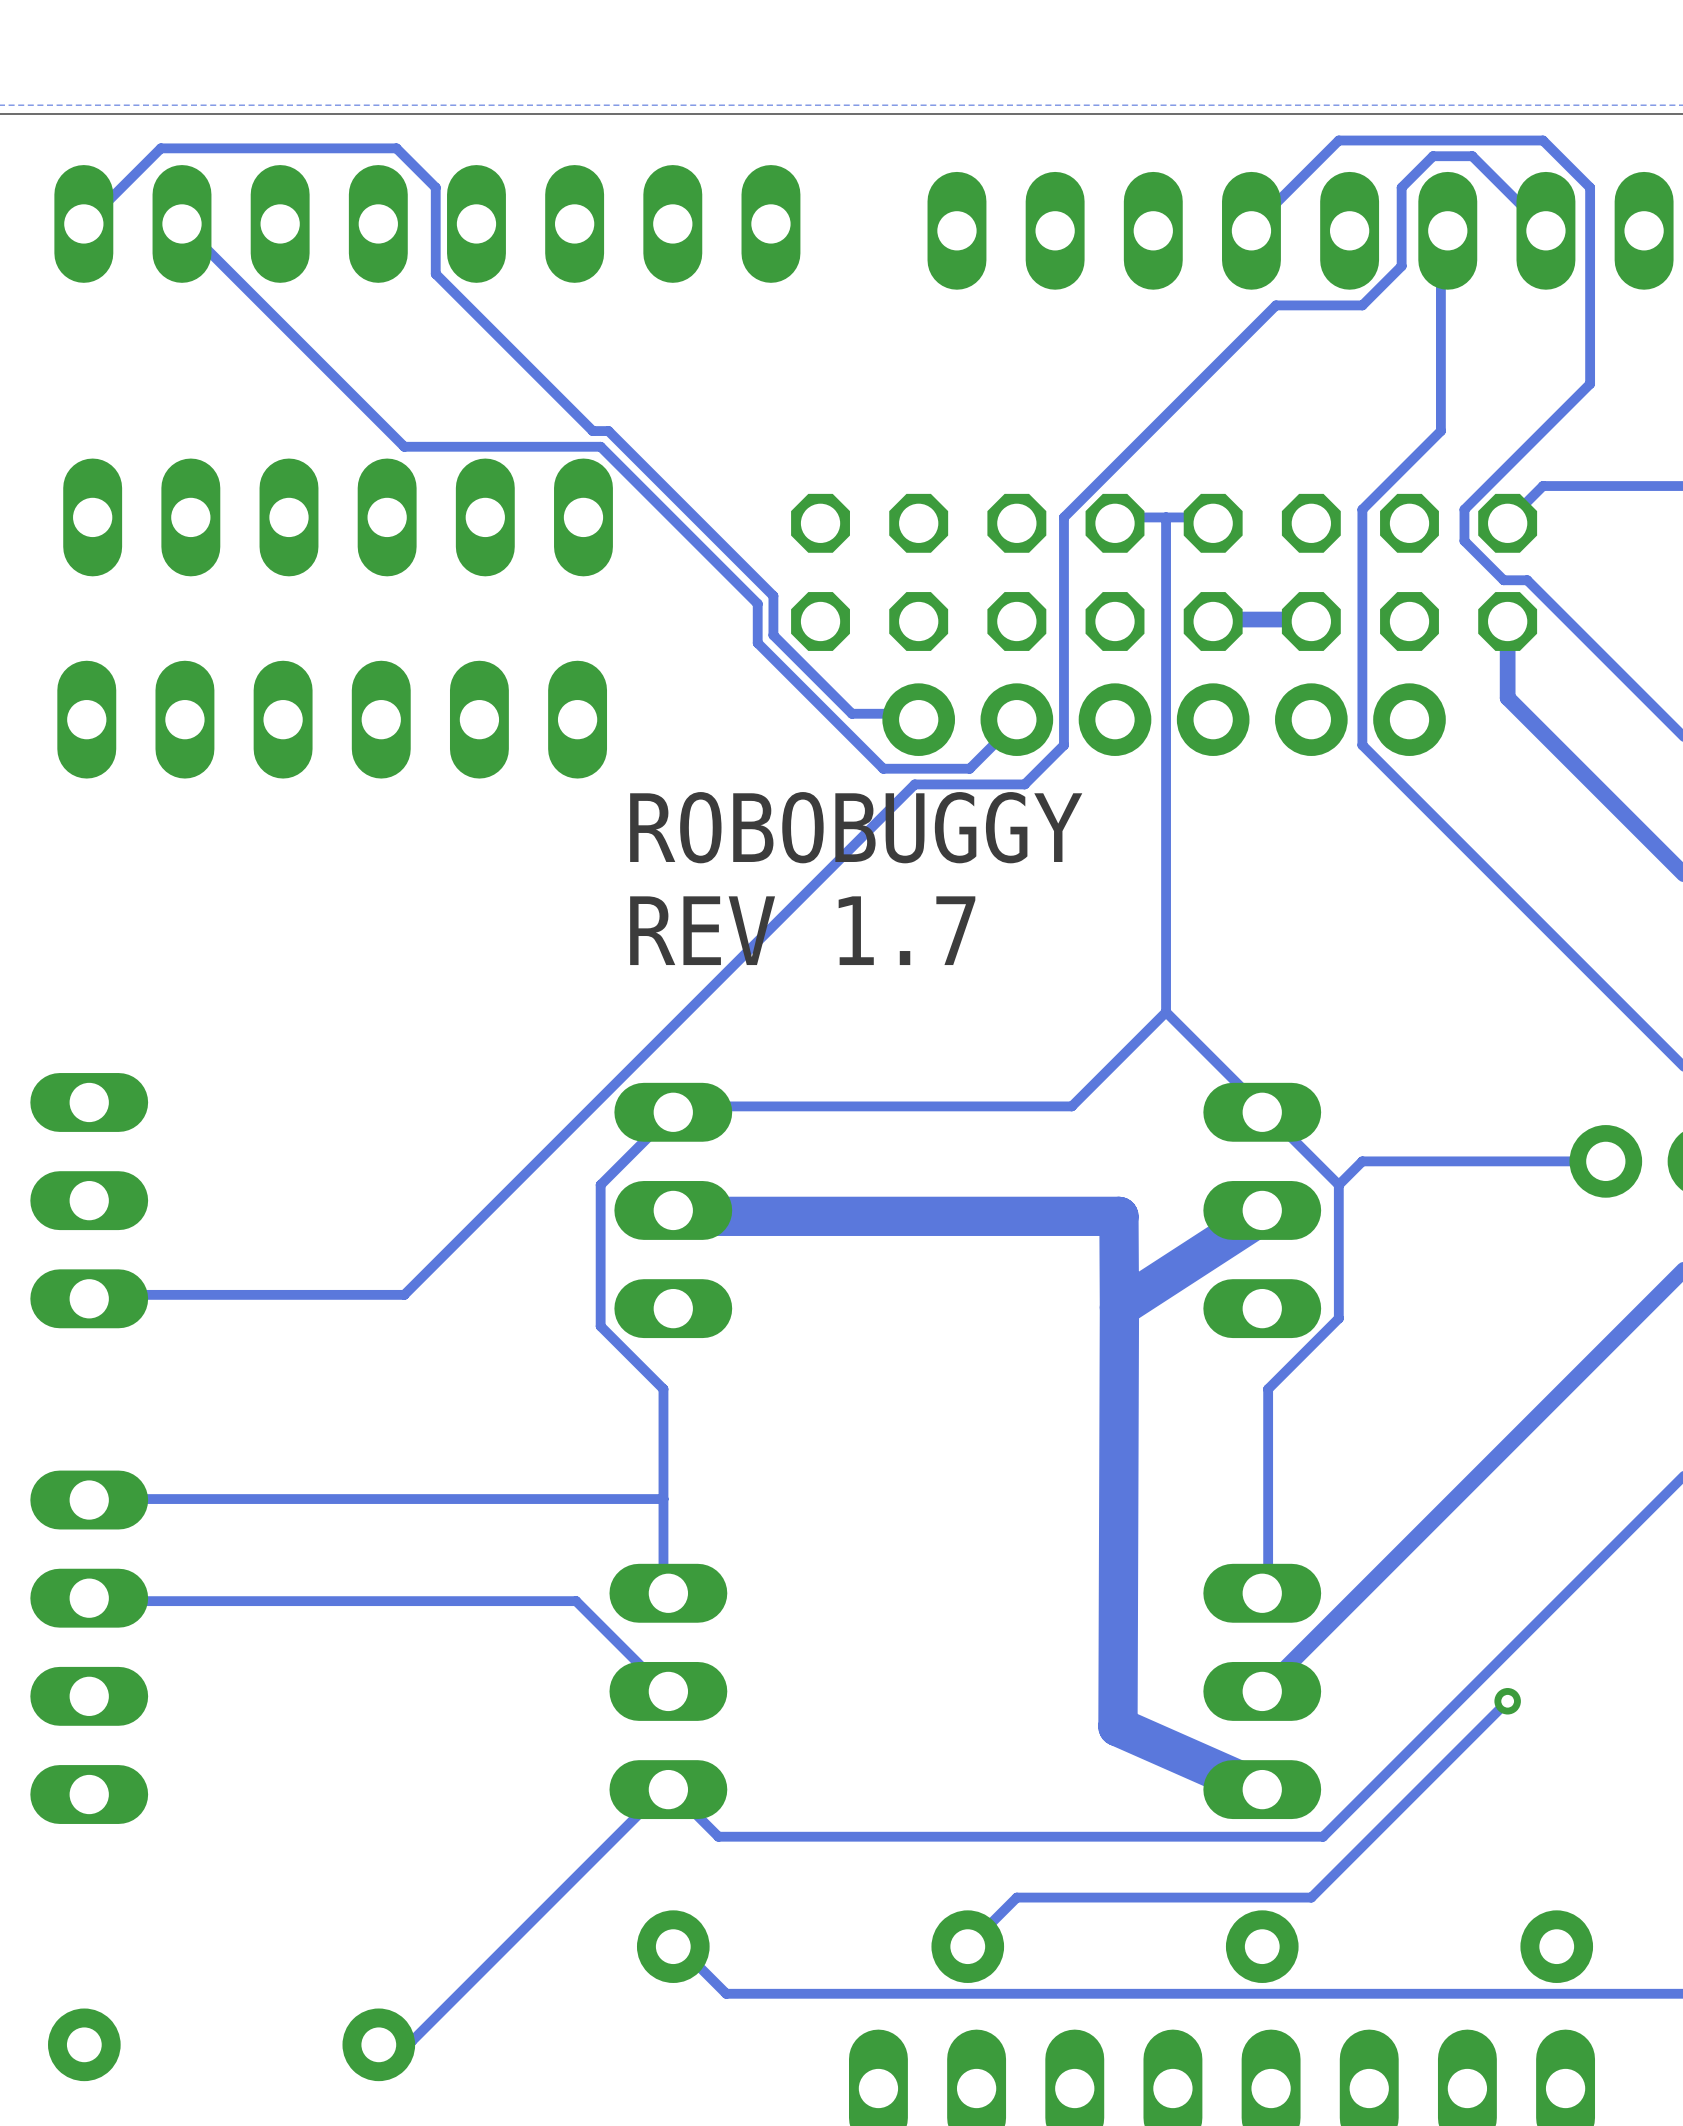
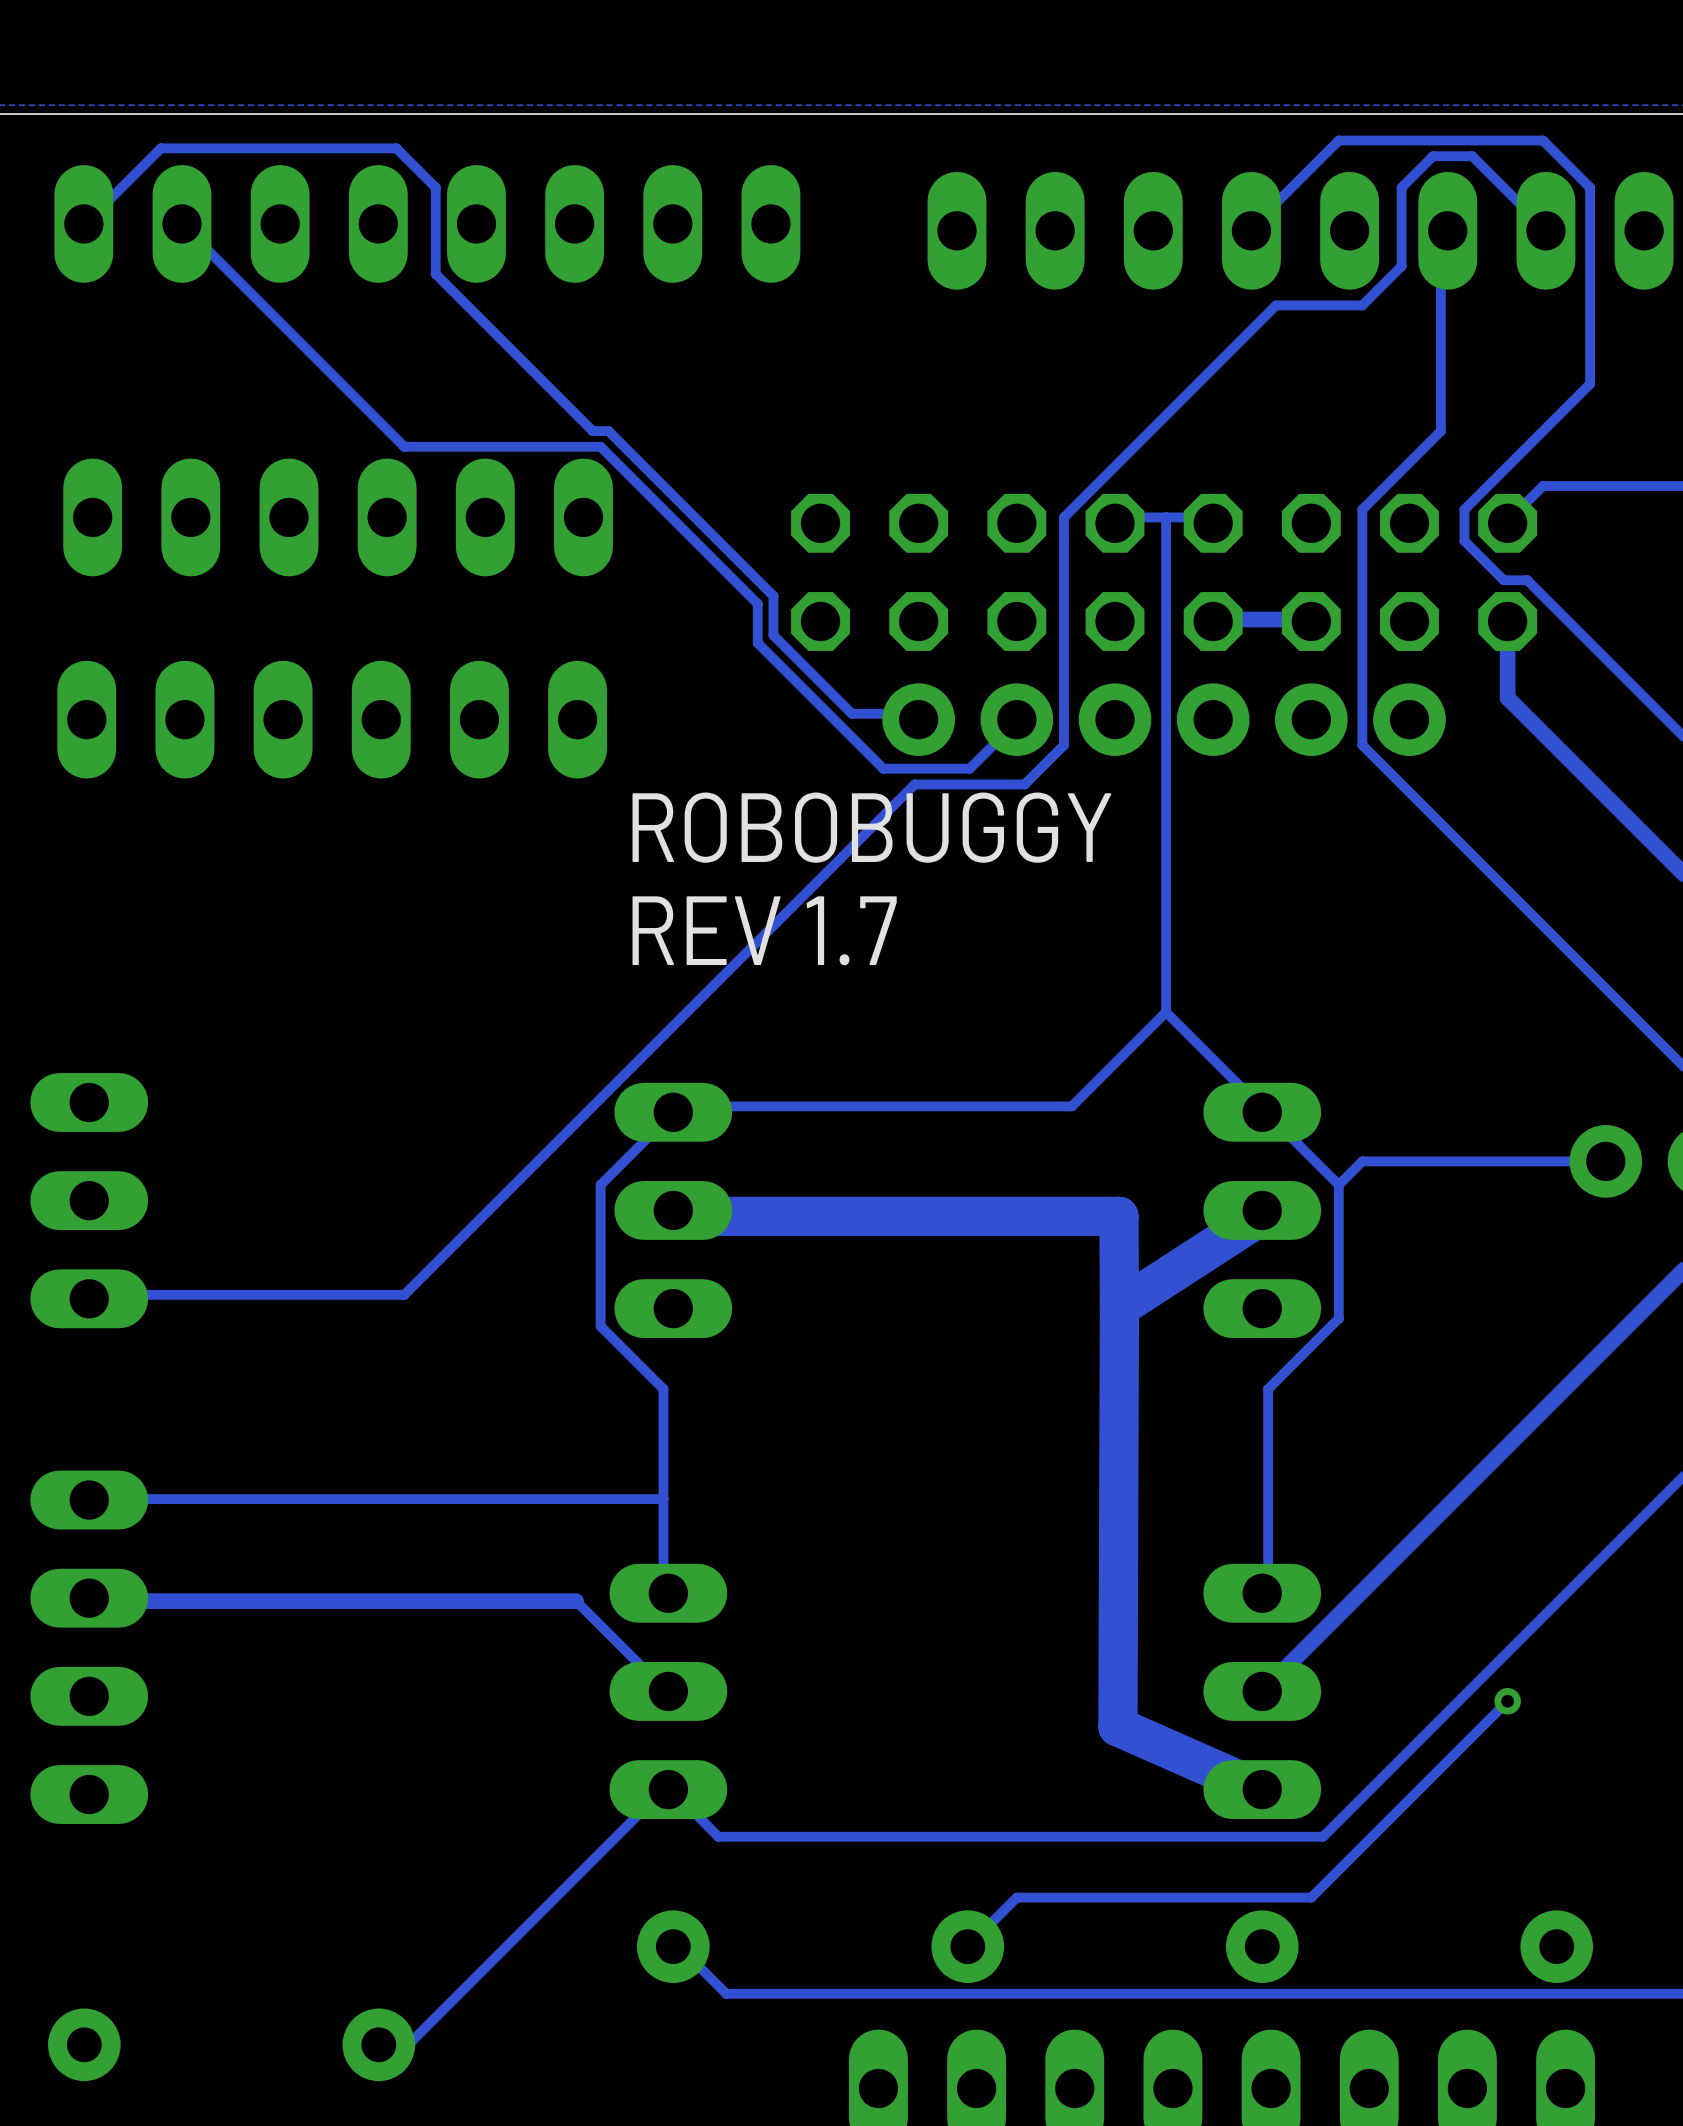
track width: thin (576, 1601) (89, 1601) -> thick (576, 1601) (89, 1601)

